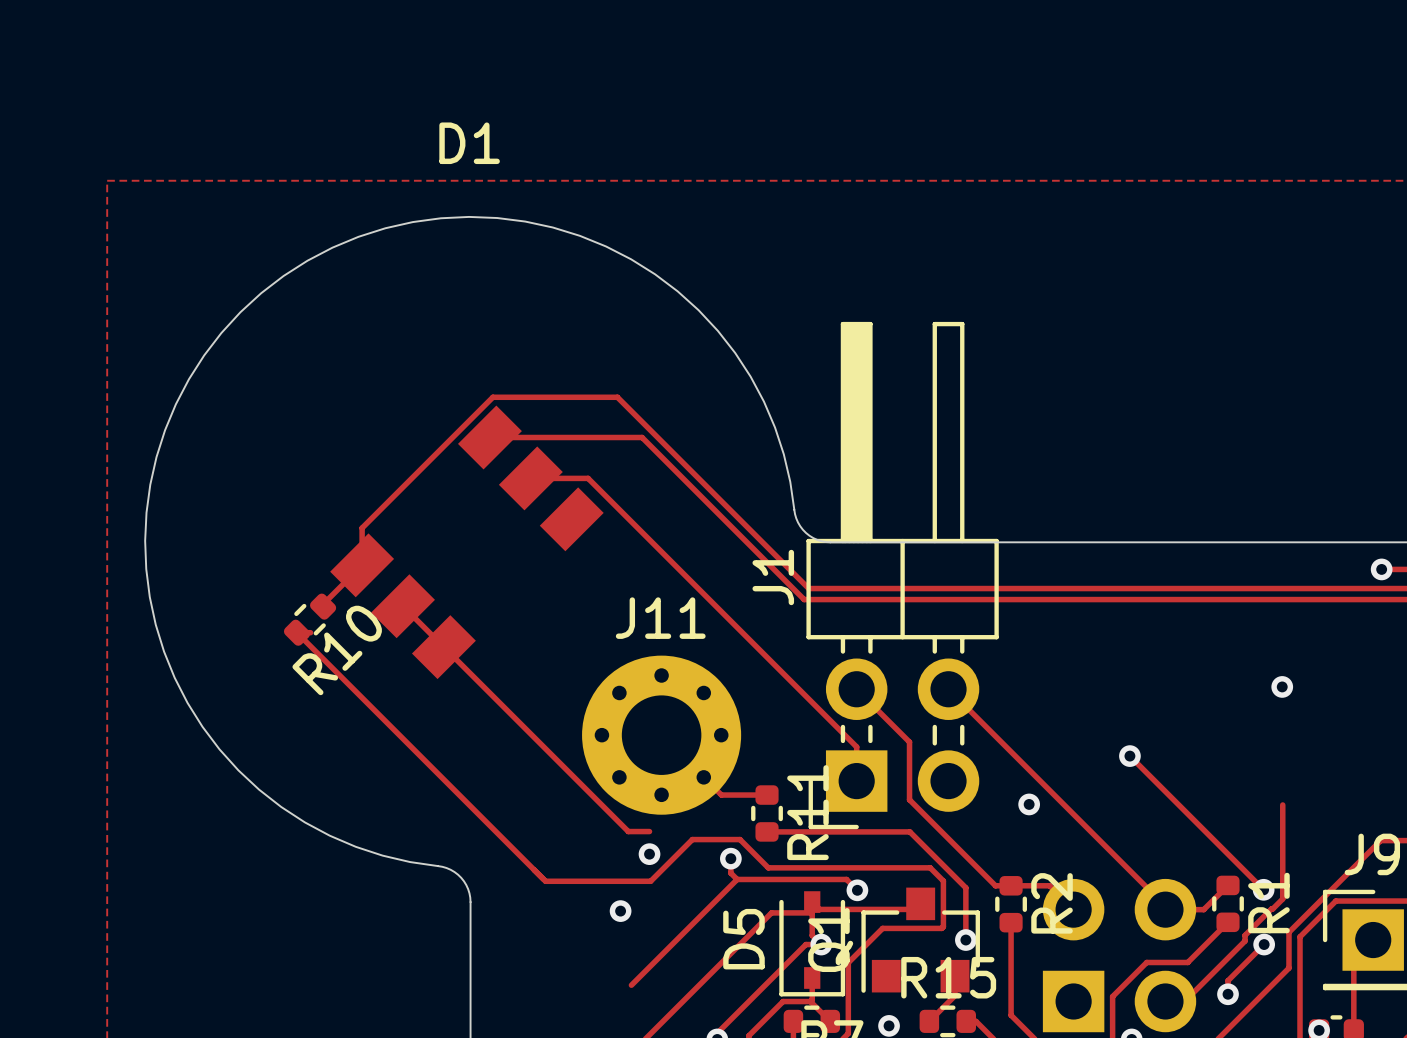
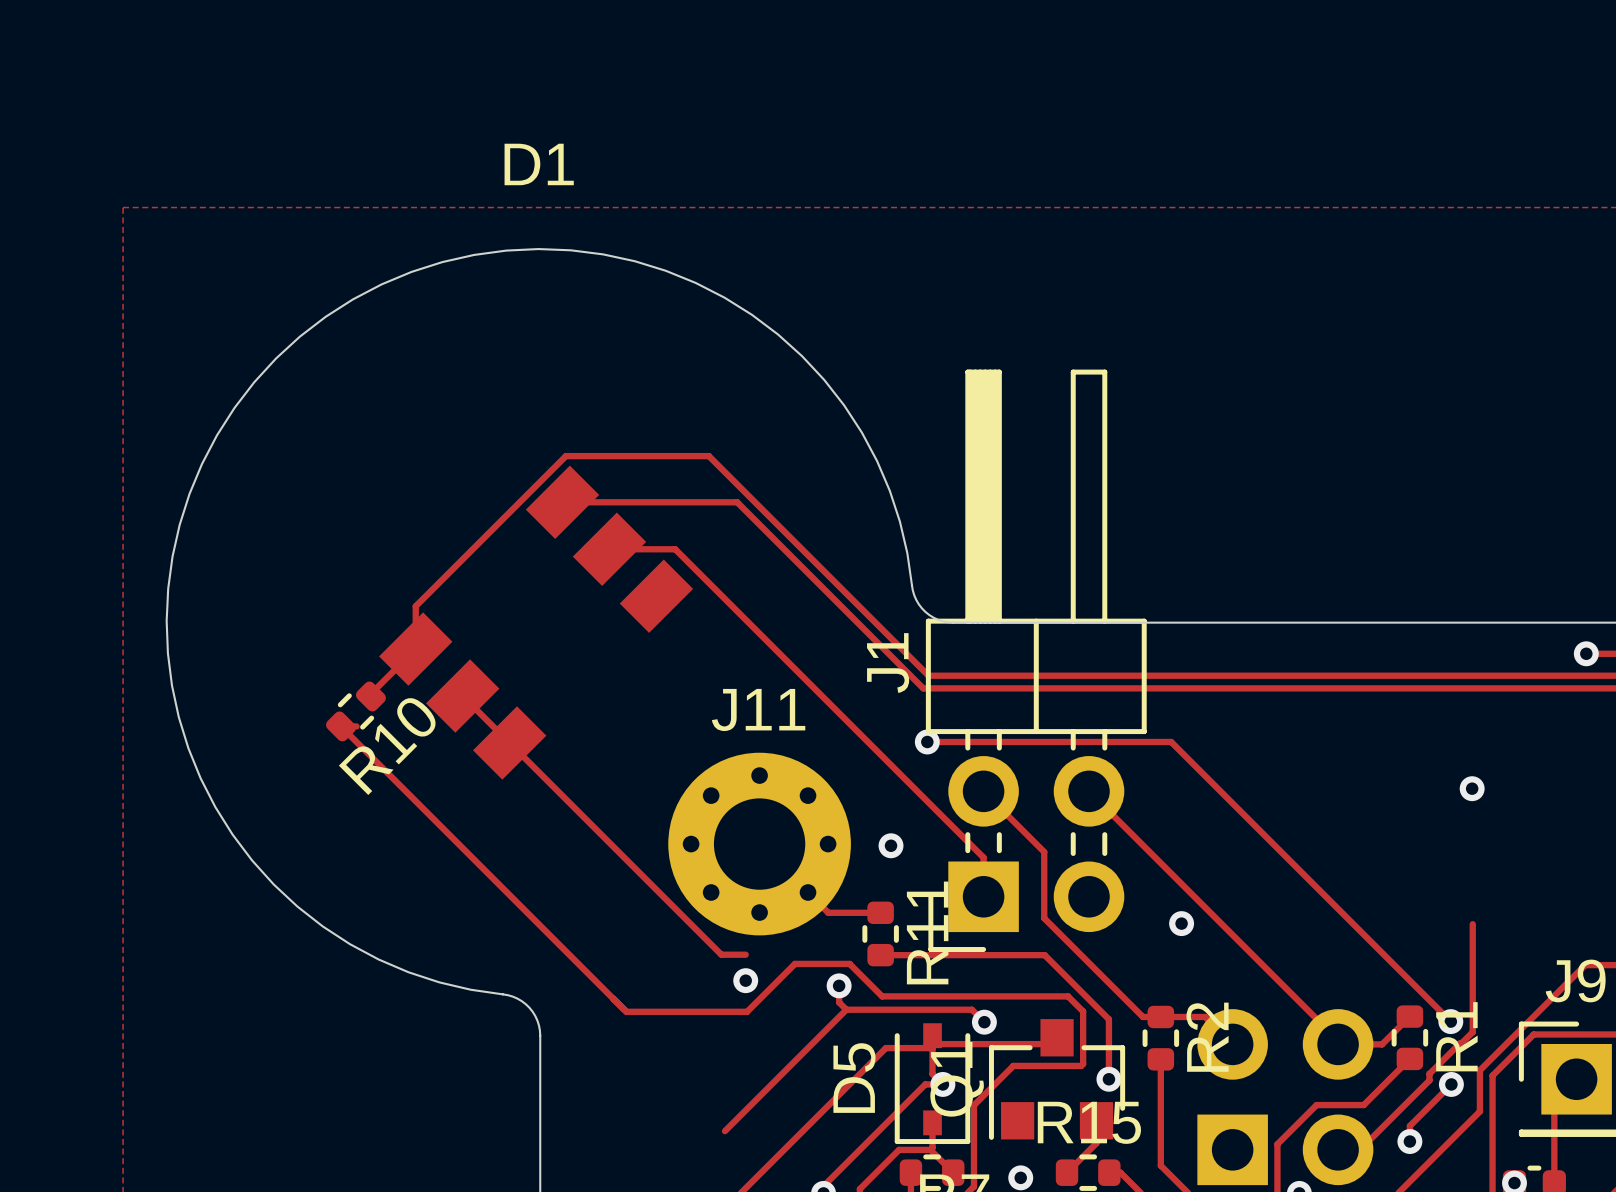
track: none -> (927, 741) (1171, 741) (1297, 868)
via: none -> (927, 741)
via: none -> (891, 845)
via: (1129, 756) -> none
via: (620, 911) -> none

